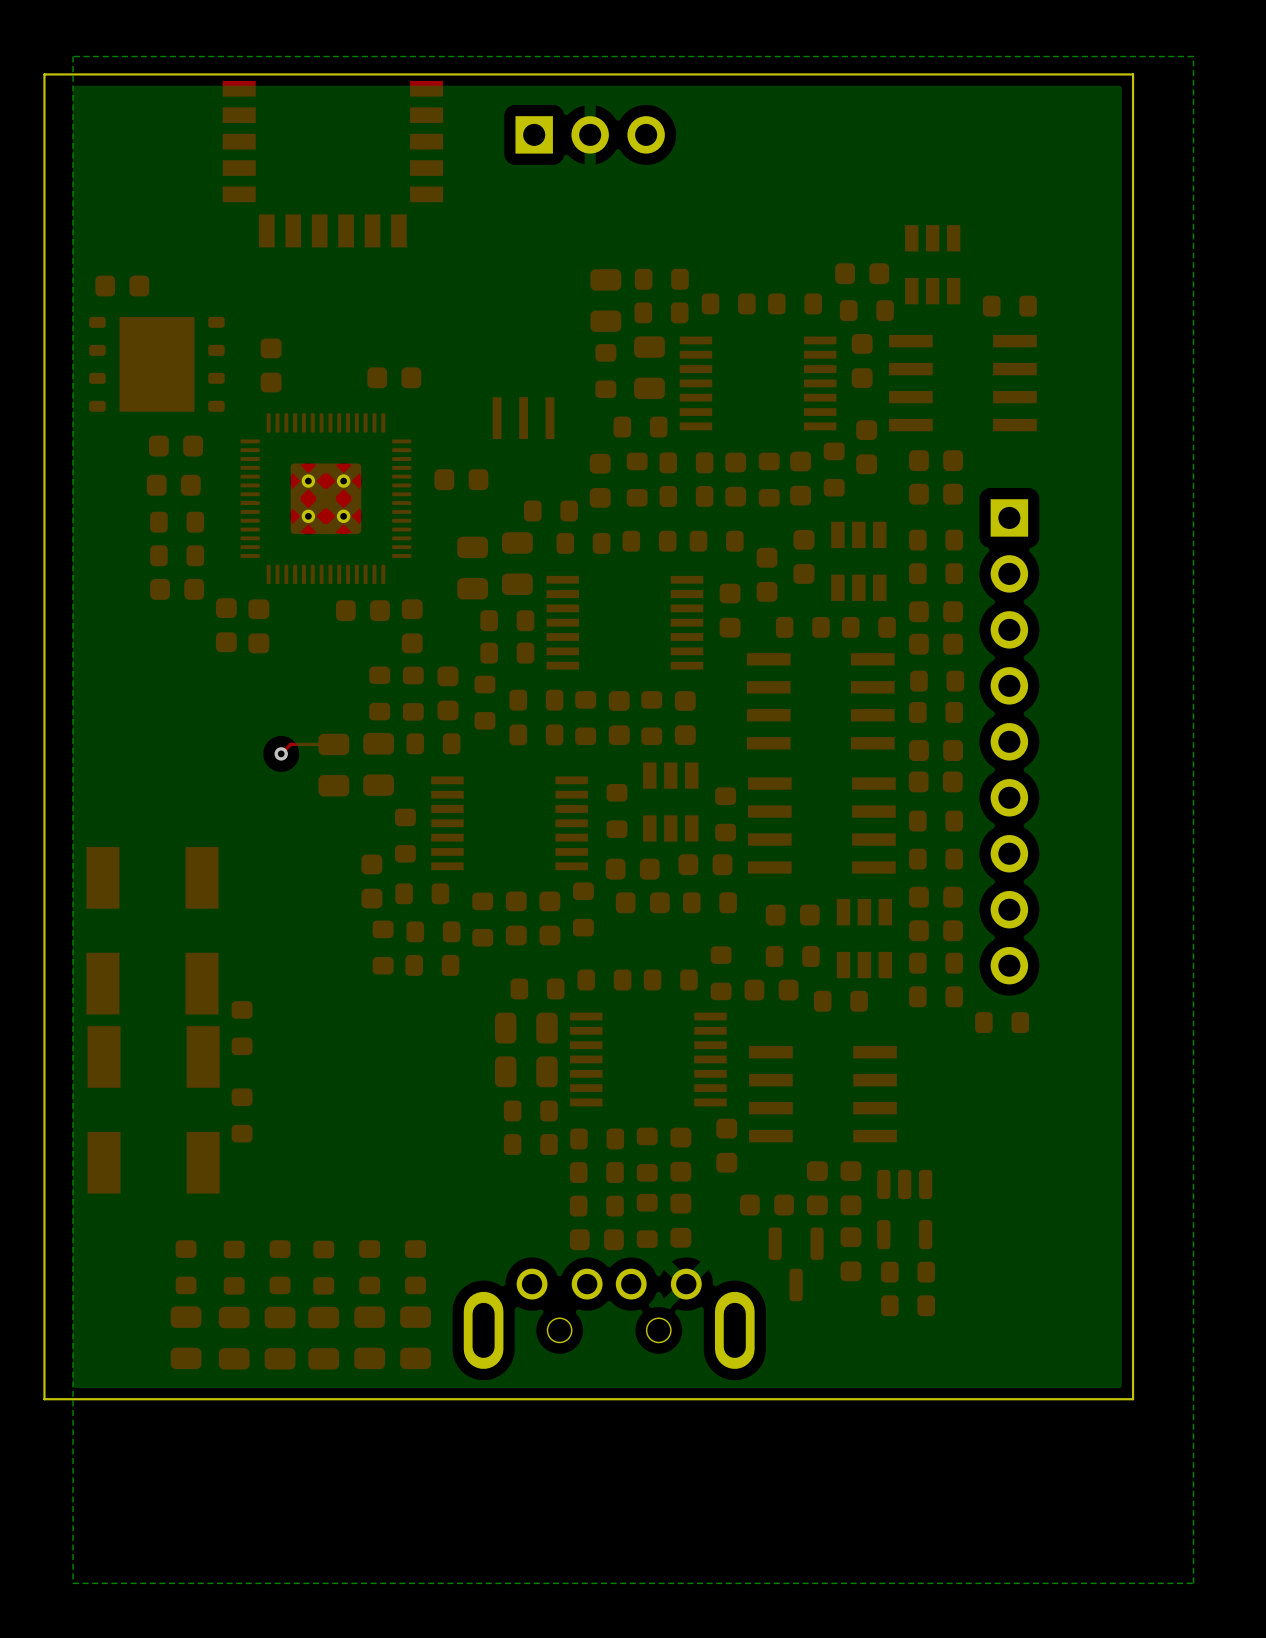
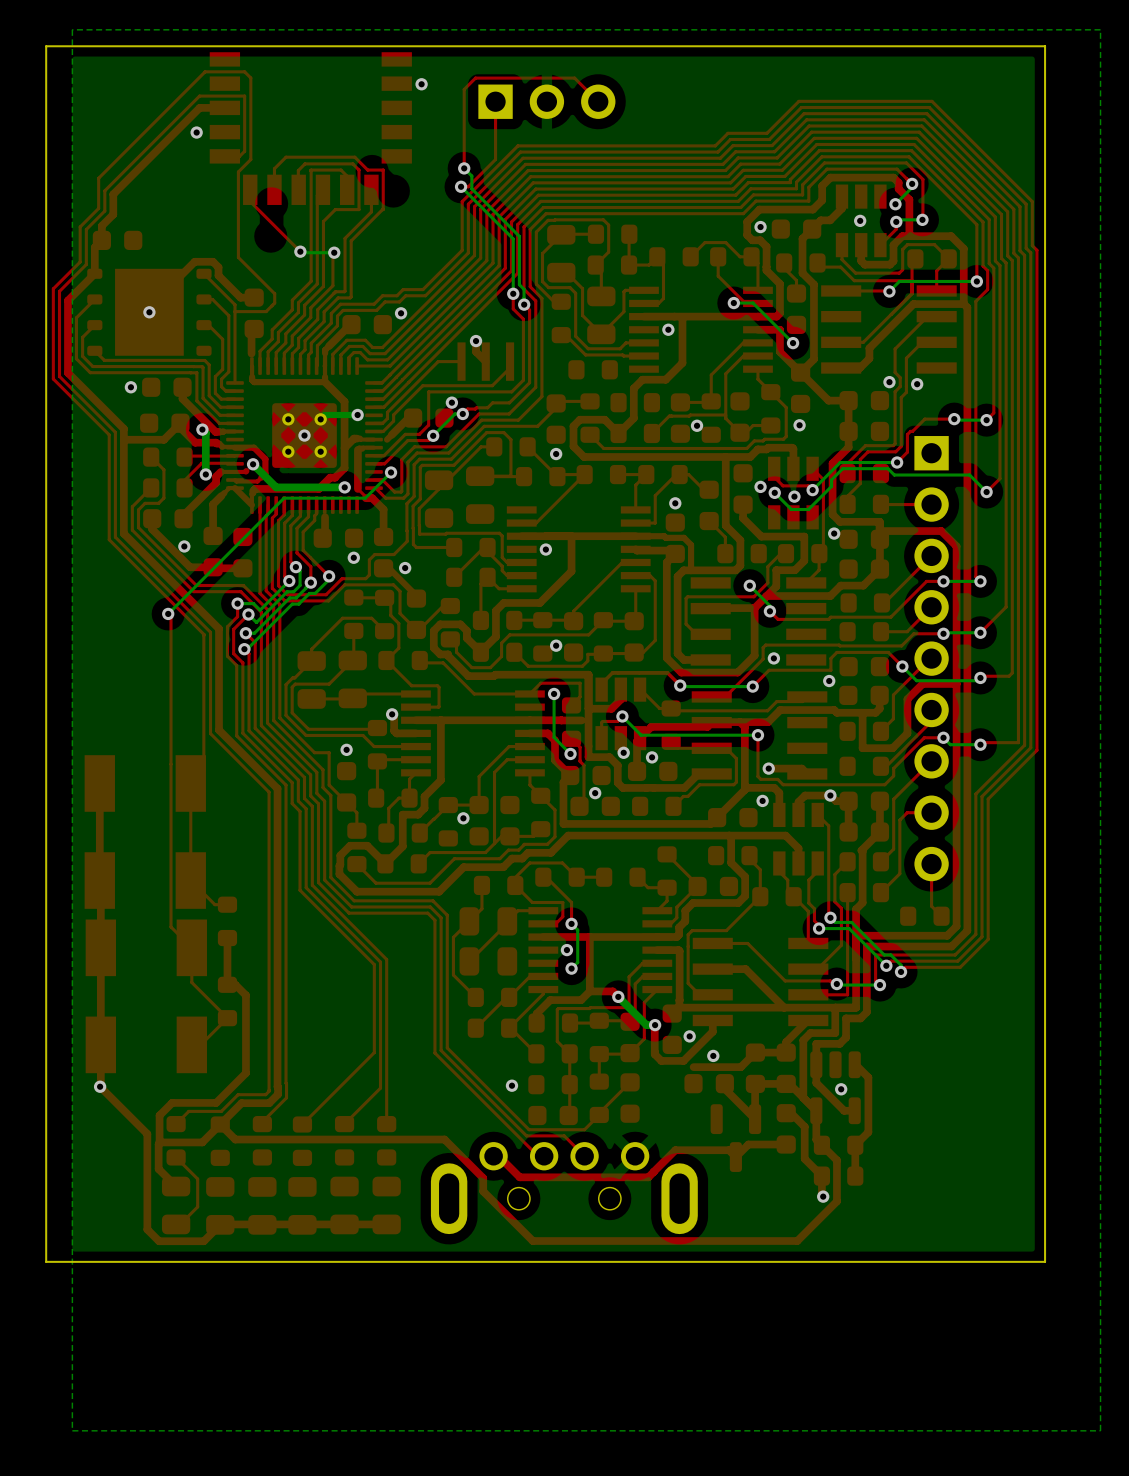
via: none -> (421, 84)
top track: none -> (495, 101) (495, 159) (468, 186) (461, 186)
top track: none -> (598, 101) (574, 78) (475, 78) (464, 89) (464, 168)
top track: none -> (224, 107) (199, 107) (113, 194) (113, 214) (101, 225) (101, 240) (94, 247) (94, 273) (67, 300) (67, 372) (123, 428) (123, 533) (219, 628) (219, 730) (277, 788) (278, 1094) (269, 1103) (241, 1103) (202, 1142) (160, 1142)
via: none -> (196, 132)
top track: none -> (224, 156) (239, 156) (244, 151) (244, 96) (199, 96) (104, 190) (104, 211) (86, 229) (86, 264) (59, 291) (59, 376) (115, 432) (115, 537) (210, 632) (210, 733) (269, 792) (269, 1090) (265, 1094) (238, 1094) (221, 1111) (188, 1111) (176, 1124)
bottom track: none -> (464, 168) (471, 176) (471, 188) (519, 236) (519, 284) (524, 289) (524, 298) (520, 301) (524, 304)
via: none -> (464, 168)
top track: none -> (911, 183) (897, 169) (827, 169) (808, 187) (808, 201) (756, 201) (743, 213) (546, 213) (530, 229) (530, 286) (541, 298) (541, 396) (518, 420) (481, 420) (448, 453) (417, 453) (407, 462) (407, 493) (403, 498) (385, 498) (374, 488)
bottom track: none -> (912, 183) (912, 187) (895, 204)
via: none -> (912, 183)
bottom track: none -> (461, 186) (513, 238) (513, 293)
via: none -> (461, 186)
top track: none -> (250, 189) (250, 201) (300, 251)
top track: none -> (274, 189) (274, 168) (286, 157) (354, 157) (367, 170) (383, 170) (383, 209) (351, 240) (351, 296) (338, 297) (324, 311) (324, 321) (305, 340) (305, 349) (300, 354) (300, 366)
top track: none -> (298, 189) (298, 170) (304, 163) (352, 163) (359, 170) (359, 209) (335, 209) (323, 221) (323, 286) (304, 305) (304, 314) (285, 333) (285, 342) (276, 352) (276, 366)
top track: none -> (322, 189) (317, 195) (317, 283) (298, 302) (298, 312) (278, 332) (278, 341) (268, 351) (268, 366)
top track: none -> (347, 189) (347, 176) (340, 170) (310, 170) (311, 281) (292, 300) (292, 309) (272, 329) (272, 339) (260, 351) (260, 366)
top track: none -> (371, 189) (371, 211) (345, 238) (345, 291) (335, 291) (317, 309) (317, 319) (298, 338) (298, 347) (292, 353) (292, 366)
top track: none -> (841, 196) (841, 208) (830, 220) (820, 220) (802, 238) (802, 273) (813, 284) (813, 359) (800, 372)
via: none -> (895, 204)
top track: none -> (922, 219) (922, 179) (906, 162) (824, 162) (802, 184) (802, 194) (753, 194) (740, 207) (543, 207) (524, 226) (524, 289) (535, 300) (535, 387) (509, 413) (479, 413) (446, 446) (414, 446) (401, 459) (401, 492) (394, 492) (382, 480) (374, 480)
bottom track: none -> (922, 219) (898, 219) (896, 221)
via: none -> (922, 219)
via: none -> (860, 220)
top track: none -> (896, 221) (896, 229) (880, 245)
via: none -> (896, 221)
via: none -> (760, 227)
top track: none -> (595, 234) (561, 234) (542, 253) (542, 281) (548, 287) (570, 287) (575, 293) (575, 336) (588, 348) (620, 348) (626, 342) (643, 342)
top track: none -> (629, 234) (629, 265) (649, 265) (657, 256) (663, 262) (663, 298) (658, 303) (643, 303)
top track: none -> (909, 236) (909, 199) (898, 188) (898, 182) (893, 177) (830, 177) (822, 185) (822, 200) (812, 209) (759, 209) (747, 221) (747, 235) (752, 240) (760, 240) (766, 246) (766, 266)
top track: none -> (841, 245) (841, 259) (855, 273) (899, 273) (902, 269) (902, 249) (907, 244) (934, 244) (948, 258) (936, 270) (936, 290)
top track: none -> (861, 245) (861, 260) (864, 264) (889, 264) (893, 261) (893, 245) (902, 236) (951, 236) (963, 248) (963, 303)
bottom track: none -> (300, 251) (334, 252)
via: none -> (300, 251)
top track: none -> (334, 252) (332, 285) (310, 307) (310, 317) (292, 336) (292, 345) (284, 353) (284, 366)
via: none -> (334, 252)
top track: none -> (690, 256) (704, 242) (725, 242) (740, 256) (751, 256) (757, 263) (757, 290)
top track: none -> (718, 256) (718, 276) (745, 303)
top track: none -> (915, 258) (912, 262) (912, 293) (863, 342) (841, 342)
top track: none -> (784, 262) (784, 268) (796, 280) (796, 293)
top track: none -> (817, 262) (821, 267) (840, 267) (854, 280) (912, 280)
top track: none -> (766, 267) (766, 270) (779, 283) (779, 313) (776, 316) (643, 316)
top track: none -> (561, 272) (566, 272) (582, 288) (582, 315) (601, 334) (623, 311) (623, 291) (643, 290)
top track: none -> (204, 273) (235, 304) (235, 382)
top track: none -> (976, 281) (976, 224) (909, 156) (821, 156) (796, 182) (796, 188) (750, 188) (738, 201) (540, 201) (517, 224) (517, 273) (383, 407) (374, 407)
bottom track: none -> (976, 281) (899, 281) (889, 291)
via: none -> (976, 281)
top track: none -> (841, 290) (889, 291)
via: none -> (889, 291)
top track: none -> (513, 293) (513, 308) (523, 319) (523, 380) (511, 391) (428, 391) (428, 425) (419, 434) (405, 434) (383, 455) (374, 455)
via: none -> (513, 293)
top track: none -> (601, 296) (601, 270) (595, 265) (608, 252) (608, 225) (603, 219) (548, 220) (536, 232) (536, 284) (553, 301) (561, 301)
top track: none -> (254, 297) (240, 297) (218, 275) (218, 267) (212, 261) (194, 261) (149, 307)
top track: none -> (94, 299) (76, 317) (76, 358) (90, 372) (190, 372)
top track: none -> (204, 299) (212, 299) (228, 315) (228, 371) (221, 379) (221, 386) (225, 391) (235, 391)
bottom track: none -> (733, 303) (752, 303) (793, 343)
via: none -> (733, 303)
top track: none -> (963, 304) (967, 307) (967, 930) (951, 946) (866, 946) (866, 1012) (860, 1018) (846, 1018) (846, 1037) (839, 1043) (816, 1043) (816, 1082) (844, 1110) (854, 1110)
top track: none -> (963, 304) (913, 304) (869, 348) (869, 358) (859, 368) (841, 368)
top track: none -> (524, 304) (529, 310) (529, 382) (509, 402) (492, 402) (487, 407) (467, 409) (462, 413)
via: none -> (524, 304)
top track: none -> (235, 311) (266, 311) (274, 303) (274, 293) (238, 257) (238, 171) (250, 159) (250, 78) (244, 71) (205, 71) (98, 178) (98, 208) (80, 226) (80, 262) (53, 288) (53, 378) (109, 434) (109, 539) (204, 634) (203, 770) (190, 783) (190, 880) (214, 904) (227, 904)
via: none -> (149, 312)
via: none -> (401, 313)
top track: none -> (682, 317) (682, 363) (665, 379) (642, 379) (633, 388) (633, 418) (618, 433) (604, 419) (579, 419) (573, 426) (573, 446) (584, 456) (750, 456) (757, 449) (792, 447) (793, 468)
top track: none -> (936, 316) (927, 316) (895, 349) (895, 372) (900, 377) (900, 386) (895, 391) (895, 443) (893, 445) (865, 445) (847, 463) (847, 473)
top track: none -> (351, 324) (325, 350) (325, 382)
top track: none -> (94, 325) (82, 337) (82, 356) (92, 366) (202, 366) (203, 398) (220, 415) (235, 415)
top track: none -> (204, 325) (208, 325) (222, 339) (222, 369) (215, 376) (215, 393) (221, 399) (235, 399)
top track: none -> (254, 328) (251, 331) (251, 353)
via: none -> (668, 329)
top track: none -> (757, 329) (779, 329) (779, 351) (828, 400) (848, 400) (848, 447) (832, 463) (832, 514) (839, 521) (879, 521) (879, 539)
top track: none -> (561, 335) (565, 335) (585, 354) (643, 356)
top track: none -> (476, 341) (476, 351) (485, 361)
via: none -> (476, 341)
top track: none -> (757, 342) (743, 342) (711, 375) (710, 402) (680, 402)
via: none -> (793, 343)
top track: none -> (936, 342) (922, 342) (906, 358) (906, 392) (901, 397) (901, 446) (895, 451) (868, 451) (860, 459) (860, 483) (847, 496) (847, 504)
top track: none -> (94, 350) (104, 360) (195, 360)
top track: none -> (757, 356) (743, 356) (725, 373) (725, 418)
top track: none -> (195, 360) (204, 360) (209, 364) (209, 395) (220, 407) (235, 407)
top track: none -> (461, 361) (438, 361) (387, 412) (387, 418) (382, 423) (374, 423)
top track: none -> (510, 361) (510, 368) (492, 385) (422, 385) (393, 414) (393, 421) (383, 431) (374, 431)
top track: none -> (308, 366) (311, 343) (331, 323) (331, 313) (340, 304) (374, 304) (382, 295) (396, 295) (403, 289) (422, 289) (462, 250) (462, 201) (517, 145) (715, 145) (727, 133) (766, 133) (798, 101) (931, 101) (1032, 201) (1032, 245) (1036, 250) (1036, 750) (988, 799) (988, 939) (960, 967) (905, 967) (901, 971)
top track: none -> (316, 366) (317, 345) (337, 325) (337, 316) (343, 310) (376, 310) (385, 301) (399, 301) (405, 295) (425, 295) (468, 252) (468, 204) (520, 152) (717, 152) (730, 139) (769, 139) (801, 107) (929, 107) (1026, 204) (1026, 248) (1030, 252) (1030, 747) (982, 796) (982, 936) (957, 961) (890, 961) (886, 965)
top track: none -> (332, 366) (332, 354) (346, 340) (365, 340) (372, 347) (382, 347) (474, 255) (474, 206) (523, 158) (720, 158) (733, 145) (772, 145) (804, 113) (926, 113) (1020, 206) (1020, 250) (1024, 255) (1024, 745) (975, 793) (975, 934) (955, 955) (875, 955) (875, 980) (879, 985)
top track: none -> (340, 366) (340, 354) (349, 346) (362, 346) (370, 353) (385, 353) (480, 258) (480, 209) (525, 164) (723, 164) (735, 151) (774, 151) (806, 119) (924, 119) (1013, 209) (1013, 253) (1018, 257) (1018, 742) (978, 742) (980, 744)
top track: none -> (348, 366) (348, 357) (353, 352) (360, 352) (367, 359) (387, 359) (486, 260) (486, 211) (528, 170) (725, 170) (738, 157) (777, 157) (809, 126) (921, 126) (1007, 211) (1007, 255) (1012, 260) (1012, 673) (1009, 676) (982, 676) (980, 677)
top track: none -> (357, 366) (390, 366) (493, 263) (493, 214) (530, 176) (728, 176) (740, 164) (779, 164) (811, 132) (919, 132) (1001, 214) (1001, 258) (1006, 263) (1006, 607) (980, 632)
top track: none -> (252, 366) (252, 380) (254, 382) (325, 382)
top track: none -> (757, 369) (757, 379) (786, 407) (786, 436) (783, 439) (754, 440) (746, 448) (603, 448) (590, 434)
top track: none -> (190, 372) (196, 372) (196, 400) (219, 423) (235, 423)
top track: none -> (325, 382) (344, 401) (344, 446)
via: none -> (889, 382)
top track: none -> (374, 382) (381, 382) (499, 265) (499, 216) (533, 182) (730, 182) (743, 170) (782, 170) (814, 138) (916, 138) (995, 216) (995, 260) (999, 265) (999, 478) (986, 492)
via: none -> (917, 384)
via: none -> (130, 387)
top track: none -> (182, 387) (182, 398) (215, 431) (235, 431)
top track: none -> (374, 391) (382, 391) (505, 268) (505, 219) (535, 189) (733, 189) (745, 176) (784, 176) (816, 144) (914, 144) (989, 219) (989, 263) (993, 268) (993, 412) (986, 420)
top track: none -> (374, 399) (383, 399) (511, 270) (511, 222) (538, 195) (735, 195) (748, 182) (790, 182) (790, 179) (819, 150) (911, 150) (983, 222) (983, 266) (987, 270) (987, 289) (975, 301) (975, 576) (980, 581)
top track: none -> (590, 401) (558, 401) (556, 407) (537, 426) (484, 426) (451, 459) (419, 459) (414, 464) (414, 496) (406, 503) (407, 541) (393, 554) (374, 554) (369, 559) (369, 575) (365, 578) (342, 578) (326, 594) (287, 594) (278, 585) (278, 520) (284, 514) (284, 505)
via: none -> (451, 402)
bottom track: none -> (462, 413) (455, 413) (433, 435)
via: none -> (462, 413)
bottom track: none -> (357, 415) (325, 415) (320, 419)
via: none -> (357, 415)
top track: none -> (413, 418) (408, 418) (387, 439)
top track: none -> (954, 419) (924, 419) (907, 434) (907, 452) (897, 462)
bottom track: none -> (954, 419) (986, 420)
via: none -> (954, 419)
via: none -> (986, 420)
top track: none -> (770, 425) (753, 425) (745, 432)
via: none -> (799, 425)
via: none -> (697, 425)
bottom track: none -> (202, 429) (205, 433) (205, 474)
via: none -> (202, 429)
top track: none -> (740, 432) (725, 418) (725, 415) (690, 415) (669, 416) (651, 433)
via: none -> (304, 435)
top track: none -> (433, 435) (428, 440) (407, 440) (384, 463) (374, 463)
via: none -> (433, 435)
top track: none -> (123, 438) (163, 439) (180, 423) (180, 427) (195, 442) (216, 442) (222, 446) (253, 447) (265, 459) (265, 473) (257, 481) (235, 480)
top track: none -> (374, 439) (353, 438) (344, 448) (344, 468) (335, 477) (330, 477) (318, 488) (255, 488) (252, 494)
top track: none -> (494, 446) (481, 446) (447, 480) (439, 480) (439, 488) (419, 508) (419, 534) (499, 533) (502, 535) (502, 557) (507, 562) (521, 562)
top track: none -> (527, 446) (557, 476) (559, 474) (584, 474) (536, 523) (521, 523)
top track: none -> (374, 447) (357, 449) (357, 488) (365, 498) (372, 498) (383, 509) (383, 536)
via: none -> (556, 454)
top track: none -> (235, 455) (184, 457)
top track: none -> (151, 457) (163, 469) (163, 498) (158, 503) (145, 503) (138, 509) (138, 527) (196, 585) (243, 585) (267, 609) (267, 723) (316, 772) (316, 793) (324, 801) (324, 880) (351, 906) (430, 906) (441, 917) (441, 1050) (526, 1135) (564, 1135) (584, 1156)
top track: none -> (725, 456) (725, 525) (740, 540) (740, 565) (735, 570) (683, 570) (677, 576) (677, 653) (684, 659) (710, 659)
bottom track: none -> (897, 462) (840, 462) (812, 490)
via: none -> (897, 462)
top track: none -> (235, 463) (201, 463) (184, 480) (184, 487)
bottom track: none -> (253, 464) (276, 487) (344, 487)
via: none -> (253, 464)
top track: none -> (774, 468) (774, 477) (783, 485) (808, 485) (812, 490)
top track: none -> (812, 468) (823, 479) (823, 549) (819, 553) (819, 570) (806, 582)
top track: none -> (246, 471) (220, 471) (216, 476) (216, 482) (183, 515) (183, 518)
bottom track: none -> (391, 472) (365, 498) (283, 498) (168, 613)
via: none -> (391, 472)
via: none -> (205, 474)
top track: none -> (618, 474) (646, 474) (635, 485) (635, 509)
top track: none -> (524, 476) (480, 476) (510, 476) (510, 439) (503, 432) (486, 432) (453, 465) (422, 465) (420, 467) (420, 499) (413, 506) (413, 544) (416, 547) (454, 547)
via: none -> (760, 486)
top track: none -> (151, 487) (132, 506) (132, 530) (193, 591) (240, 591) (261, 612) (261, 725) (310, 774) (310, 795) (318, 803) (318, 882) (349, 913) (427, 913) (434, 920) (434, 1053) (538, 1156) (544, 1156)
via: none -> (344, 487)
top track: none -> (709, 489) (703, 489) (688, 474) (676, 474) (655, 495) (655, 523) (635, 523)
via: none -> (812, 490)
bottom track: none -> (986, 492) (969, 475) (894, 475) (888, 468) (842, 468) (831, 479) (831, 486) (808, 509) (791, 509) (774, 492)
via: none -> (986, 492)
via: none -> (774, 492)
top track: none -> (251, 494) (251, 505) (235, 488) (229, 488) (213, 504) (213, 535)
via: none -> (794, 496)
via: none -> (675, 503)
top track: none -> (743, 504) (743, 518) (761, 536) (804, 536) (804, 560) (794, 570) (776, 570) (776, 586) (754, 608)
top track: none -> (931, 504) (881, 504)
top track: none -> (260, 505) (260, 593) (273, 607) (273, 720) (322, 769) (322, 787) (330, 795) (330, 877) (354, 900) (432, 900) (447, 915) (447, 1047) (529, 1129) (584, 1129) (630, 1082)
top track: none -> (268, 505) (268, 513) (266, 515) (266, 590) (279, 604) (279, 717) (314, 752) (329, 752) (329, 785) (356, 812) (356, 830)
top track: none -> (276, 505) (276, 514) (272, 518) (272, 588) (284, 600) (328, 600) (344, 584) (393, 584) (400, 591) (400, 613) (416, 629) (419, 629) (443, 606) (450, 606)
top track: none -> (292, 505) (292, 515) (284, 523) (284, 576) (289, 581)
top track: none -> (300, 505) (300, 516) (290, 525) (290, 562) (295, 567)
top track: none -> (308, 505) (308, 516) (297, 528) (297, 552) (310, 566) (310, 582)
top track: none -> (316, 505) (314, 520) (303, 532) (303, 550) (329, 576)
top track: none -> (325, 517) (325, 535) (322, 538)
top track: none -> (152, 518) (152, 529) (190, 567) (242, 568)
top track: none -> (709, 521) (725, 537) (725, 553)
top track: none -> (879, 531) (941, 531) (956, 546) (956, 926) (947, 935) (856, 935)
via: none -> (834, 533)
top track: none -> (521, 536) (683, 537) (691, 544) (691, 570)
top track: none -> (571, 536) (571, 571) (539, 602) (503, 602) (495, 610) (495, 636) (480, 652) (466, 638) (466, 630) (460, 624) (440, 624) (433, 630) (433, 648) (440, 654) (448, 654) (468, 676) (588, 674) (588, 757) (609, 757) (617, 765) (617, 782) (622, 787) (684, 787) (698, 773) (711, 773)
top track: none -> (879, 539) (879, 569) (863, 585) (840, 585) (830, 596) (766, 596)
via: none -> (184, 546)
via: none -> (545, 549)
top track: none -> (635, 549) (671, 550) (675, 553) (666, 562) (666, 658) (681, 672) (737, 672) (754, 655) (754, 608)
top track: none -> (780, 553) (767, 566) (767, 582) (753, 596) (687, 596) (686, 598) (686, 624) (696, 634) (710, 634)
top track: none -> (931, 555) (884, 602) (881, 602)
via: none -> (353, 557)
top track: none -> (635, 562) (622, 562) (573, 611) (573, 621) (514, 620)
bottom track: none -> (295, 567) (300, 571) (300, 585) (293, 591) (287, 591) (256, 622) (248, 614)
via: none -> (295, 567)
top track: none -> (388, 568) (416, 595) (416, 598)
via: none -> (405, 568)
top track: none -> (521, 575) (507, 575) (502, 570) (502, 566) (487, 551) (487, 547) (484, 547) (454, 577)
top track: none -> (635, 575) (650, 575) (655, 580) (655, 640) (643, 652) (587, 654) (587, 660) (582, 666) (528, 666) (514, 652)
bottom track: none -> (329, 576) (329, 579) (315, 593) (309, 593) (298, 604) (292, 604) (247, 649) (244, 649)
via: none -> (329, 576)
bottom track: none -> (289, 581) (260, 610) (253, 603) (237, 603)
via: none -> (289, 581)
top track: none -> (943, 581) (926, 581) (890, 617) (778, 619) (769, 611)
via: none -> (943, 581)
bottom track: none -> (980, 581) (943, 581)
via: none -> (980, 581)
bottom track: none -> (310, 582) (296, 597) (289, 597) (254, 633) (245, 633)
via: none -> (310, 582)
bottom track: none -> (749, 585) (769, 605) (769, 611)
via: none -> (749, 585)
top track: none -> (521, 588) (499, 588) (487, 577) (480, 583) (480, 620)
top track: none -> (635, 588) (634, 621) (603, 620) (588, 634) (509, 634) (501, 643) (501, 656) (490, 667) (471, 667) (456, 652) (456, 645) (450, 639)
top track: none -> (354, 597) (384, 597) (390, 603) (390, 615) (398, 623) (398, 648) (386, 660) (411, 685) (439, 687) (438, 707) (415, 707)
top track: none -> (237, 603) (237, 616) (227, 626) (227, 656) (236, 665) (236, 735) (286, 785) (286, 1097) (262, 1124)
via: none -> (237, 603)
top track: none -> (931, 607) (907, 631) (880, 631)
top track: none -> (754, 608) (710, 608)
top track: none -> (171, 610) (171, 927) (191, 947) (191, 982) (227, 1018) (200, 1044) (191, 1044)
via: none -> (769, 611)
via: none -> (168, 613)
top track: none -> (248, 614) (233, 629) (233, 653) (242, 662) (242, 733) (292, 782) (292, 803) (300, 811) (300, 890) (374, 964) (374, 1052) (302, 1124)
via: none -> (248, 614)
top track: none -> (353, 630) (353, 659) (329, 684) (295, 684) (292, 687) (292, 712) (308, 729) (377, 728)
top track: none -> (384, 631) (371, 618) (342, 618) (311, 649) (311, 661) (286, 684) (286, 715) (306, 735) (363, 735) (374, 746) (415, 746)
bottom track: none -> (980, 632) (943, 633)
via: none -> (980, 632)
top track: none -> (245, 633) (255, 642) (255, 728) (304, 777) (304, 798) (312, 806) (312, 885) (386, 959) (386, 1124)
via: none -> (245, 633)
top track: none -> (943, 633) (913, 633) (901, 645) (765, 645) (763, 647) (763, 659) (725, 696) (711, 696)
via: none -> (943, 633)
via: none -> (556, 645)
top track: none -> (244, 649) (249, 653) (249, 730) (298, 780) (298, 801) (306, 808) (306, 887) (380, 962) (380, 1088) (344, 1124)
via: none -> (244, 649)
via: none -> (773, 658)
top track: none -> (931, 658) (893, 695) (893, 718) (880, 731)
top track: none -> (419, 660) (422, 662) (443, 662) (474, 693) (529, 693) (540, 683) (580, 683) (580, 696) (571, 705)
top track: (333, 744) (290, 744) (281, 753) -> none
top track: none -> (902, 666) (888, 652) (836, 652) (830, 658) (830, 670) (769, 670) (752, 686)
bottom track: none -> (902, 666) (916, 680) (977, 680) (980, 677)
via: none -> (902, 666)
via: (281, 753) -> none
top track: none -> (667, 672) (612, 672) (601, 683) (601, 689) (603, 682) (612, 672)
via: none -> (980, 677)
via: none -> (829, 681)
top track: none -> (956, 683) (922, 683) (907, 699) (907, 733) (892, 748) (862, 748) (861, 712)
bottom track: none -> (680, 685) (752, 686)
via: none -> (680, 685)
via: none -> (752, 686)
top track: none -> (620, 689) (620, 699) (611, 708) (588, 708)
top track: none -> (640, 689) (659, 708) (671, 708) (673, 710) (767, 710) (776, 701) (802, 701) (807, 696)
top track: none -> (415, 693) (357, 693) (352, 698) (311, 698)
bottom track: none -> (554, 693) (554, 737) (570, 753)
via: none -> (554, 693)
top track: none -> (879, 695) (879, 708) (875, 712) (836, 712) (834, 710) (780, 710) (768, 722) (712, 722) (707, 726) (651, 726) (637, 741) (637, 771)
top track: none -> (931, 709) (931, 721) (886, 766) (880, 766)
top track: none -> (392, 714) (394, 716) (394, 730) (396, 733) (415, 733)
via: none -> (392, 714)
top track: none -> (622, 716) (617, 721) (601, 722) (601, 738)
bottom track: none -> (622, 716) (641, 735) (757, 735)
via: none -> (622, 716)
top track: none -> (440, 720) (440, 780) (424, 796) (424, 808) (418, 814) (402, 814) (402, 846) (385, 863) (367, 845) (350, 845) (340, 855) (339, 874) (356, 891) (439, 891) (463, 867) (503, 867) (511, 858) (522, 858) (528, 852) (550, 852) (568, 835) (785, 835) (798, 848) (798, 863)
top track: none -> (561, 720) (415, 720)
top track: none -> (581, 720) (561, 720)
top track: none -> (740, 722) (744, 726) (744, 789) (710, 823) (563, 823) (563, 782) (570, 775) (555, 760) (555, 740) (547, 733) (529, 733)
top track: none -> (757, 735) (757, 776) (760, 779) (777, 779) (783, 784) (884, 784) (893, 775) (893, 768) (924, 737) (943, 737)
via: none -> (757, 735)
bottom track: none -> (943, 737) (950, 744) (980, 744)
via: none -> (943, 737)
top track: none -> (571, 738) (580, 747) (580, 761) (583, 765) (583, 801) (579, 806)
top track: none -> (671, 741) (677, 748) (726, 748) (736, 758) (736, 782) (733, 784) (699, 784) (687, 796) (683, 796) (673, 806)
via: none -> (980, 744)
top track: none -> (529, 746) (509, 746) (479, 776) (479, 805) (448, 805) (419, 833)
via: none -> (346, 749)
via: none -> (623, 752)
via: none -> (570, 753)
via: none -> (652, 757)
top track: none -> (415, 759) (379, 759) (377, 761) (376, 798)
top track: none -> (529, 759) (507, 759) (494, 772) (494, 843)
top track: none -> (931, 761) (893, 799) (893, 849) (880, 861)
top track: none -> (768, 768) (801, 768) (807, 773)
via: none -> (768, 768)
top track: none -> (415, 772) (409, 779) (409, 798) (399, 798) (388, 808) (388, 830) (386, 833)
top track: none -> (529, 772) (529, 785) (554, 810) (554, 836) (547, 844) (524, 844)
top track: none -> (99, 783) (100, 1086) (147, 1133) (147, 1229) (159, 1241) (203, 1241) (220, 1224) (386, 1224)
top track: none -> (744, 785) (747, 787) (774, 787) (779, 792) (779, 814)
via: none -> (595, 793)
via: none -> (830, 795)
via: none -> (762, 800)
top track: none -> (879, 801) (879, 832) (861, 850) (862, 902) (856, 909) (856, 1007) (678, 1007)
top track: none -> (931, 812) (907, 812) (899, 820) (899, 873) (880, 892)
top track: none -> (798, 814) (798, 802) (805, 795) (830, 795) (836, 801) (848, 801) (848, 832)
top track: none -> (817, 814) (828, 825) (828, 916) (830, 917)
via: none -> (463, 818)
top track: none -> (540, 829) (533, 836) (501, 836) (485, 852) (430, 852) (418, 863)
top track: none -> (729, 835) (731, 837) (731, 862) (745, 876) (745, 896) (738, 902) (693, 902) (685, 910) (685, 921) (679, 927) (679, 934) (676, 936) (543, 936)
top track: none -> (524, 844) (518, 850) (508, 850) (499, 858) (454, 858) (429, 883) (376, 883) (356, 864)
top track: none -> (667, 854) (697, 886) (676, 907) (676, 917) (670, 923) (657, 923)
top track: none -> (749, 855) (749, 858) (760, 869) (760, 896) (726, 930) (692, 930) (688, 934) (688, 983) (699, 994) (712, 994)
top track: none -> (847, 861) (834, 874) (834, 901) (841, 908) (841, 945) (817, 969) (808, 969)
top track: none -> (779, 863) (779, 871) (787, 880) (787, 890) (808, 911) (808, 943)
top track: none -> (817, 863) (817, 871) (808, 880) (808, 903) (814, 908) (814, 920) (819, 925) (819, 928)
top track: none -> (931, 864) (931, 906) (941, 916)
top track: none -> (543, 877) (546, 877) (571, 902) (571, 923)
top track: none -> (604, 877) (576, 877) (562, 862) (529, 862) (515, 877) (515, 885) (532, 902) (562, 902) (562, 916) (555, 923) (543, 923)
top track: none -> (637, 877) (648, 887) (667, 887) (667, 900) (657, 910)
top track: none -> (481, 885) (481, 908) (453, 937) (453, 975) (475, 997)
top track: none -> (847, 892) (847, 994) (808, 994)
top track: none -> (543, 910) (517, 910) (469, 961)
bottom track: none -> (830, 917) (835, 922) (851, 922) (884, 954) (890, 954) (901, 965) (901, 971)
via: none -> (830, 917)
bottom track: none -> (571, 923) (577, 930) (577, 962) (571, 968)
via: none -> (571, 923)
bottom track: none -> (819, 928) (849, 928) (886, 965)
via: none -> (819, 928)
top track: none -> (589, 936) (589, 991)
top track: none -> (227, 938) (227, 984) (235, 984) (245, 995) (245, 1073) (216, 1102) (172, 1102) (159, 1115) (160, 1142)
top track: none -> (712, 943) (747, 943) (785, 980) (830, 980) (836, 984)
via: none -> (566, 950)
top track: none -> (657, 950) (679, 951) (679, 1000)
top track: none -> (657, 963) (642, 963) (629, 976) (629, 1007) (557, 1009) (557, 1041) (569, 1053) (568, 1115)
via: none -> (886, 965)
via: none -> (571, 968)
top track: none -> (712, 969) (745, 969) (784, 1007)
via: none -> (901, 971)
top track: none -> (543, 976) (530, 976) (475, 1028)
top track: none -> (657, 976) (642, 976) (635, 984) (635, 1016) (630, 1021) (599, 1020) (596, 1023) (569, 1023)
bottom track: none -> (836, 984) (879, 985)
via: none -> (836, 984)
via: none -> (879, 985)
top track: none -> (543, 989) (543, 994) (509, 1028) (536, 1053)
top track: none -> (657, 989) (644, 1002) (644, 1038) (629, 1054) (599, 1054) (599, 1081)
top track: none -> (589, 991) (581, 1000) (550, 1000) (536, 1013) (536, 1023)
top track: none -> (589, 991) (612, 991) (618, 996)
bottom track: none -> (618, 996) (646, 1025) (655, 1025)
via: none -> (618, 996)
top track: none -> (835, 1007) (835, 1033) (810, 1033) (803, 1040) (803, 1097)
top track: none -> (712, 1020) (712, 1031) (683, 1060) (661, 1060) (654, 1054) (655, 1025)
top track: none -> (808, 1020) (786, 1042) (786, 1052) (755, 1052) (740, 1067) (693, 1067)
via: none -> (655, 1025)
via: none -> (689, 1036)
via: none -> (713, 1055)
top track: none -> (854, 1064) (868, 1077) (868, 1132) (855, 1145) (855, 1176)
top track: none -> (724, 1083) (724, 1088) (755, 1119) (755, 1083) (789, 1083) (816, 1110) (816, 1139) (836, 1160) (836, 1201) (797, 1241) (532, 1241) (483, 1191) (483, 1178) (444, 1139) (235, 1139) (220, 1124)
via: none -> (511, 1085)
via: none -> (100, 1086)
via: none -> (841, 1089)
top track: none -> (786, 1113) (791, 1113) (804, 1126) (804, 1158) (821, 1176) (823, 1196)
top track: none -> (160, 1142) (158, 1144) (158, 1169) (176, 1186)
top track: none -> (786, 1144) (748, 1144) (735, 1157) (729, 1150) (675, 1150) (648, 1177) (519, 1177) (498, 1156) (493, 1156)
top track: none -> (176, 1157) (197, 1179) (197, 1206) (180, 1224) (176, 1224)
via: none -> (823, 1196)

